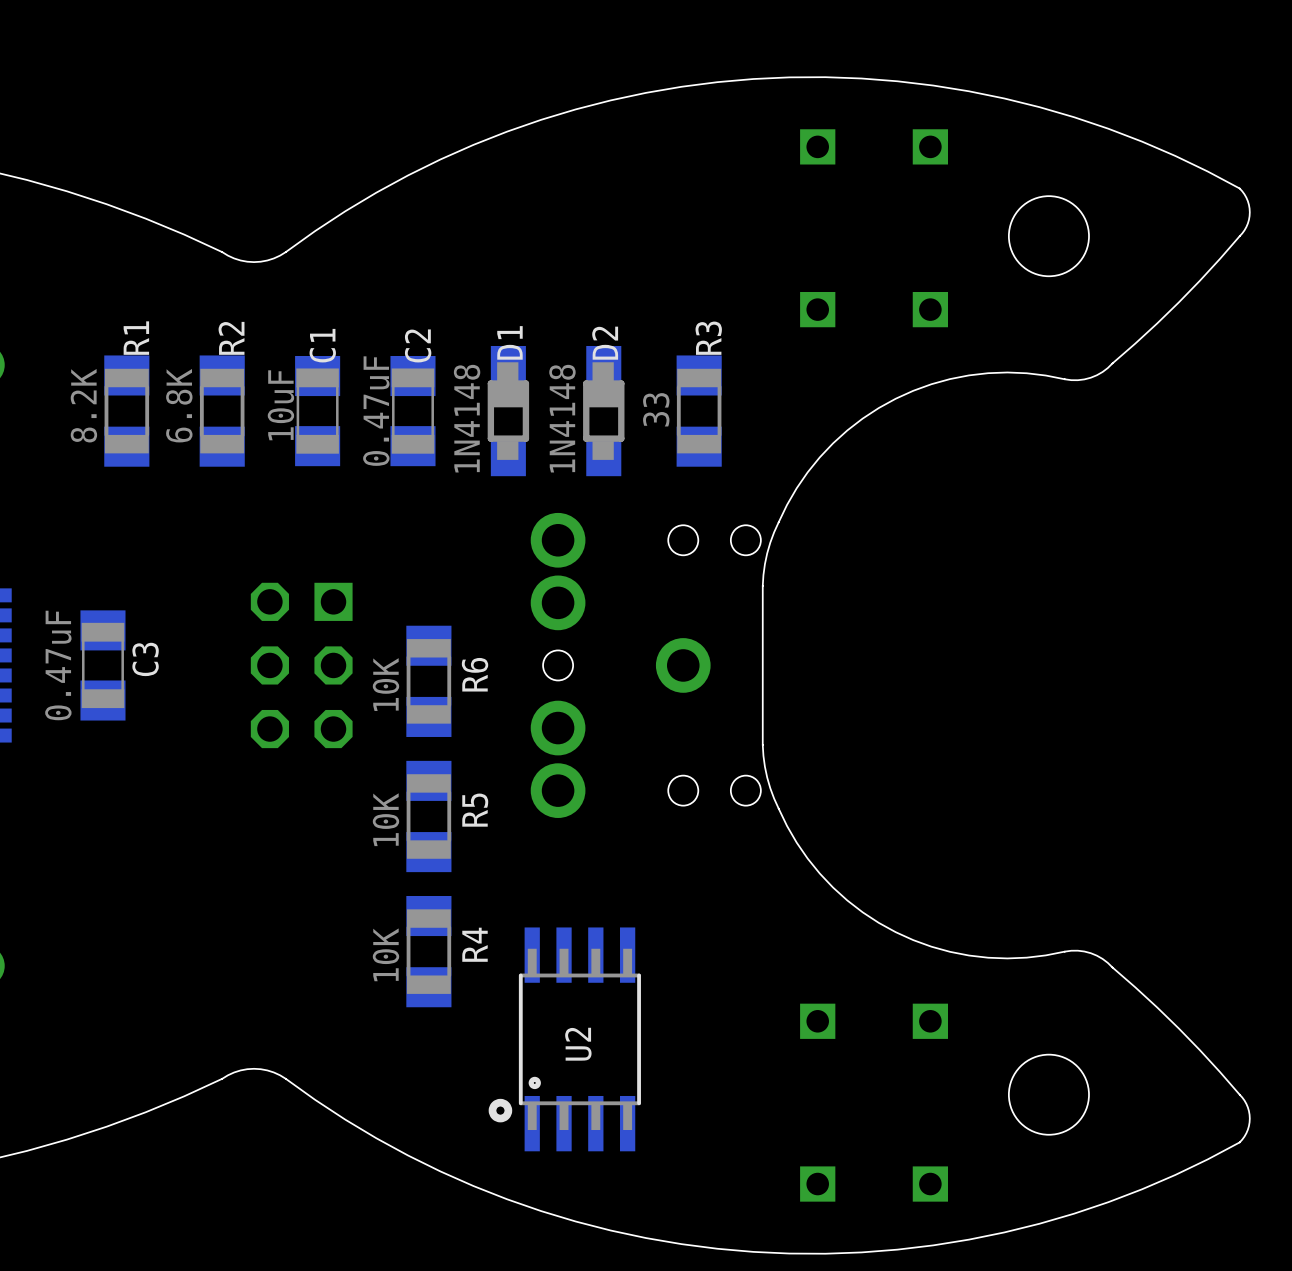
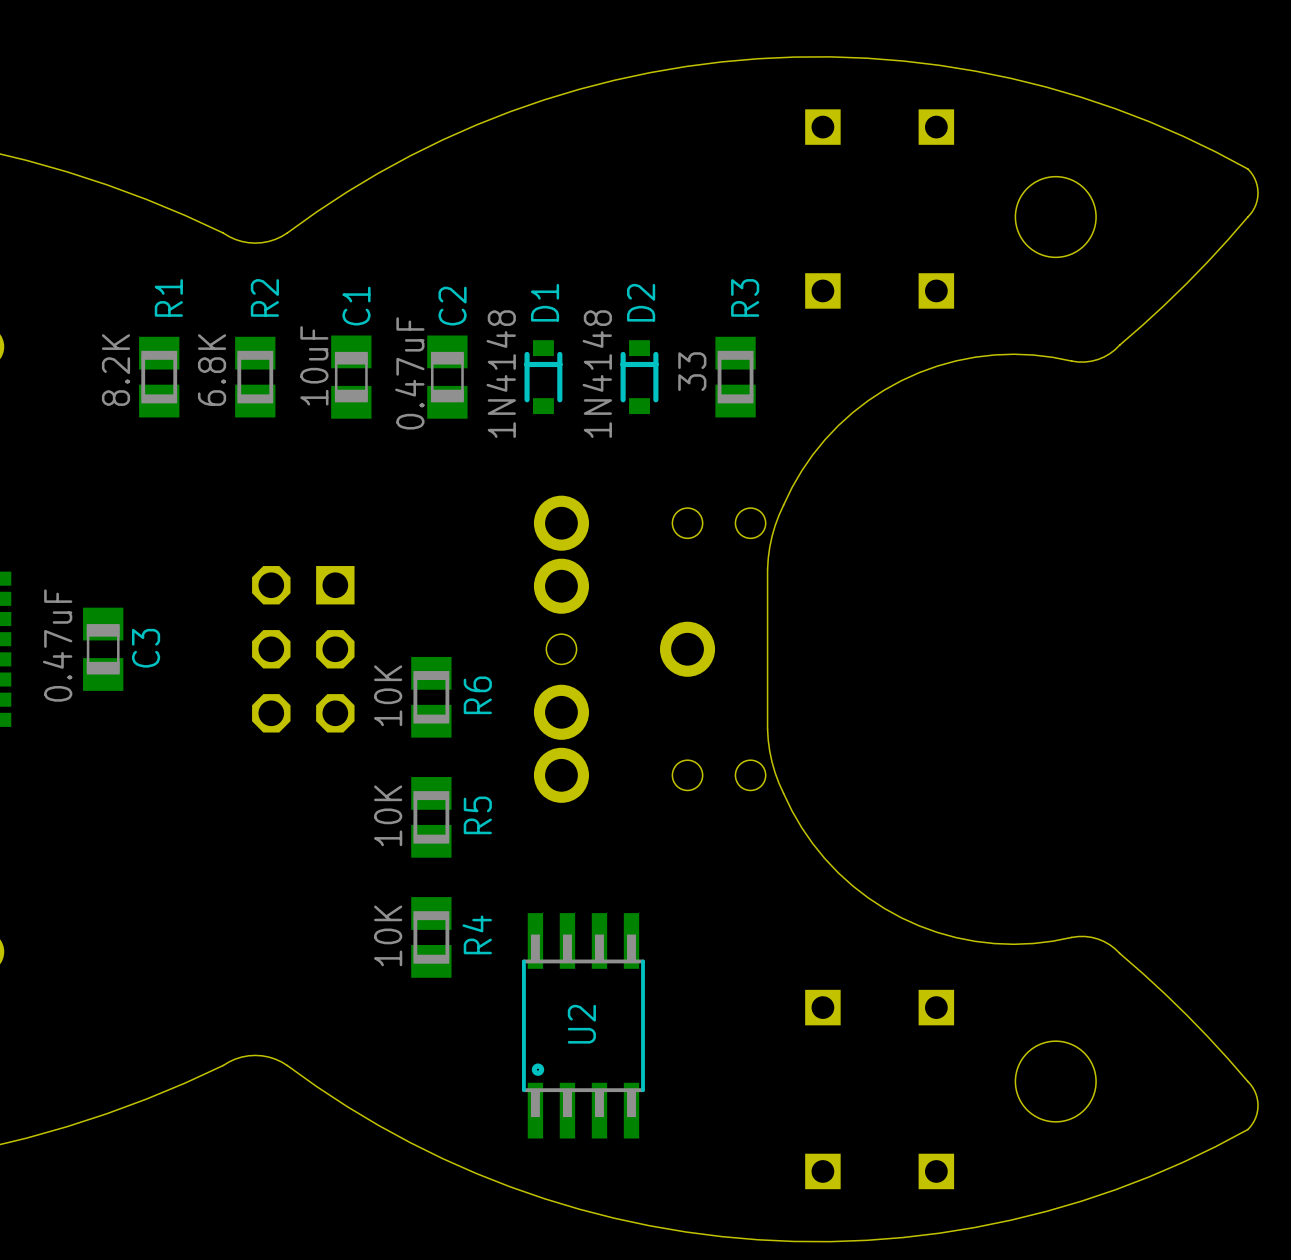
D1 footprint: [487, 345, 530, 477] -> [524, 340, 563, 415]
D2 footprint: [583, 345, 625, 477] -> [620, 340, 659, 415]
R1 footprint: [104, 355, 150, 467] -> [139, 336, 180, 418]
R2 footprint: [199, 355, 245, 467] -> [235, 336, 276, 418]
R3 footprint: [676, 355, 722, 467] -> [715, 336, 756, 418]
C1 footprint: [295, 356, 341, 467] -> [331, 335, 372, 419]
C2 footprint: [390, 356, 436, 467] -> [427, 335, 468, 419]
C3 footprint: [80, 610, 126, 721] -> [83, 607, 124, 691]
R6 footprint: [406, 625, 452, 737] -> [411, 656, 452, 738]
R5 footprint: [406, 760, 452, 873] -> [411, 777, 452, 858]
R4 footprint: [406, 895, 452, 1008] -> [411, 897, 452, 978]
drawing: [488, 1098, 513, 1123] -> none

